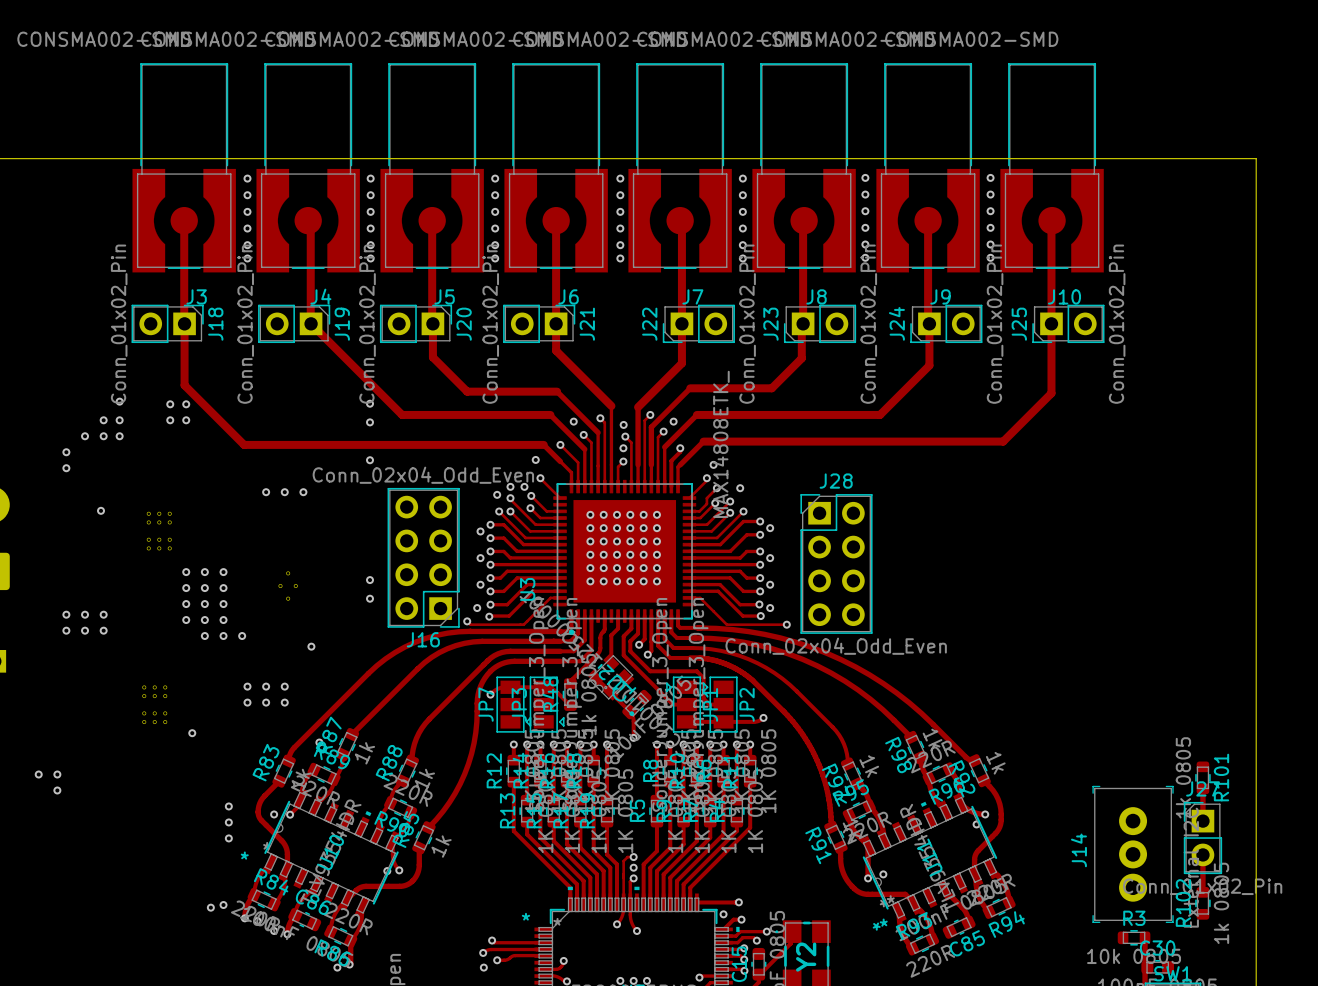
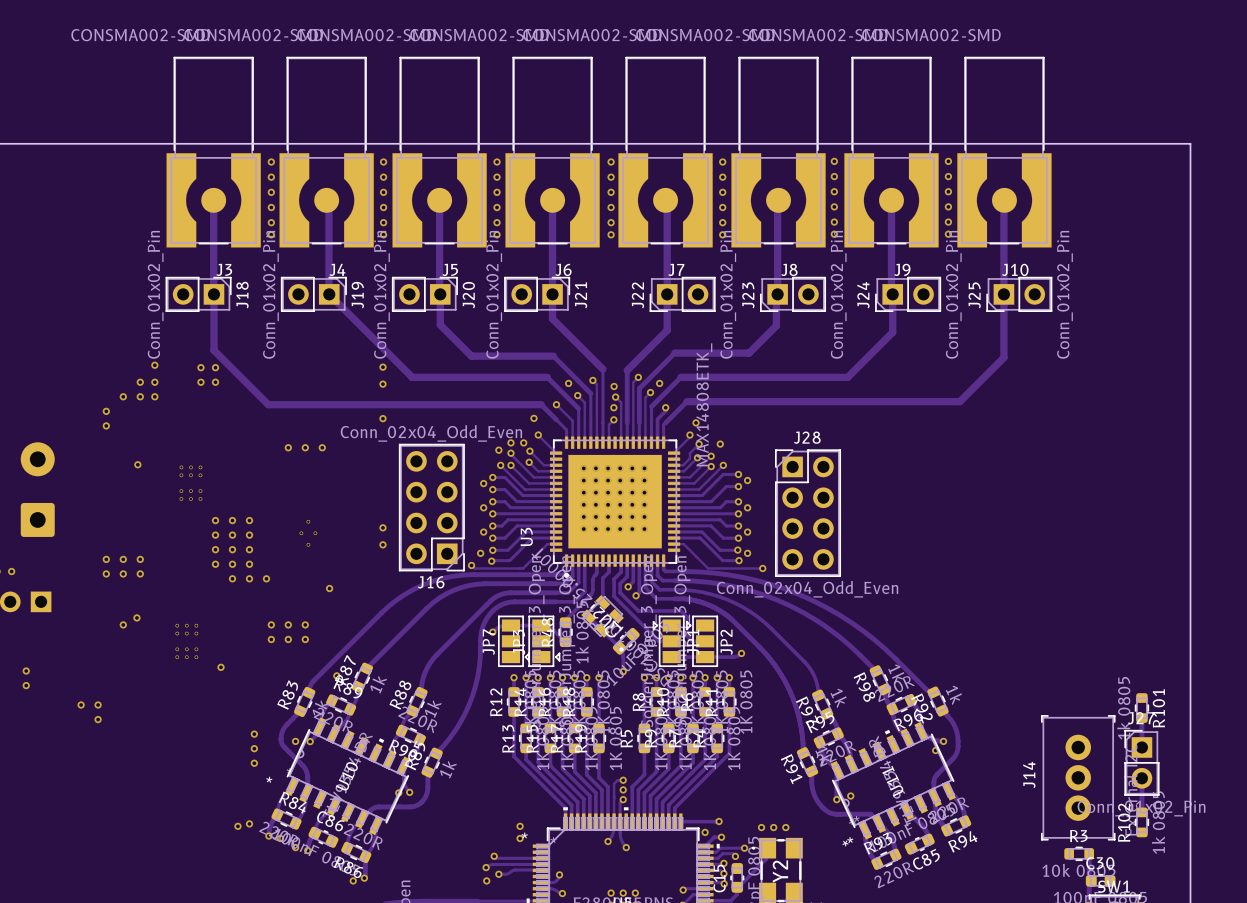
via: none -> (136, 617)
via: none -> (123, 624)
via: none -> (520, 826)
via: none -> (761, 827)
via: none -> (773, 827)
via: none -> (785, 827)
via: none -> (520, 838)

